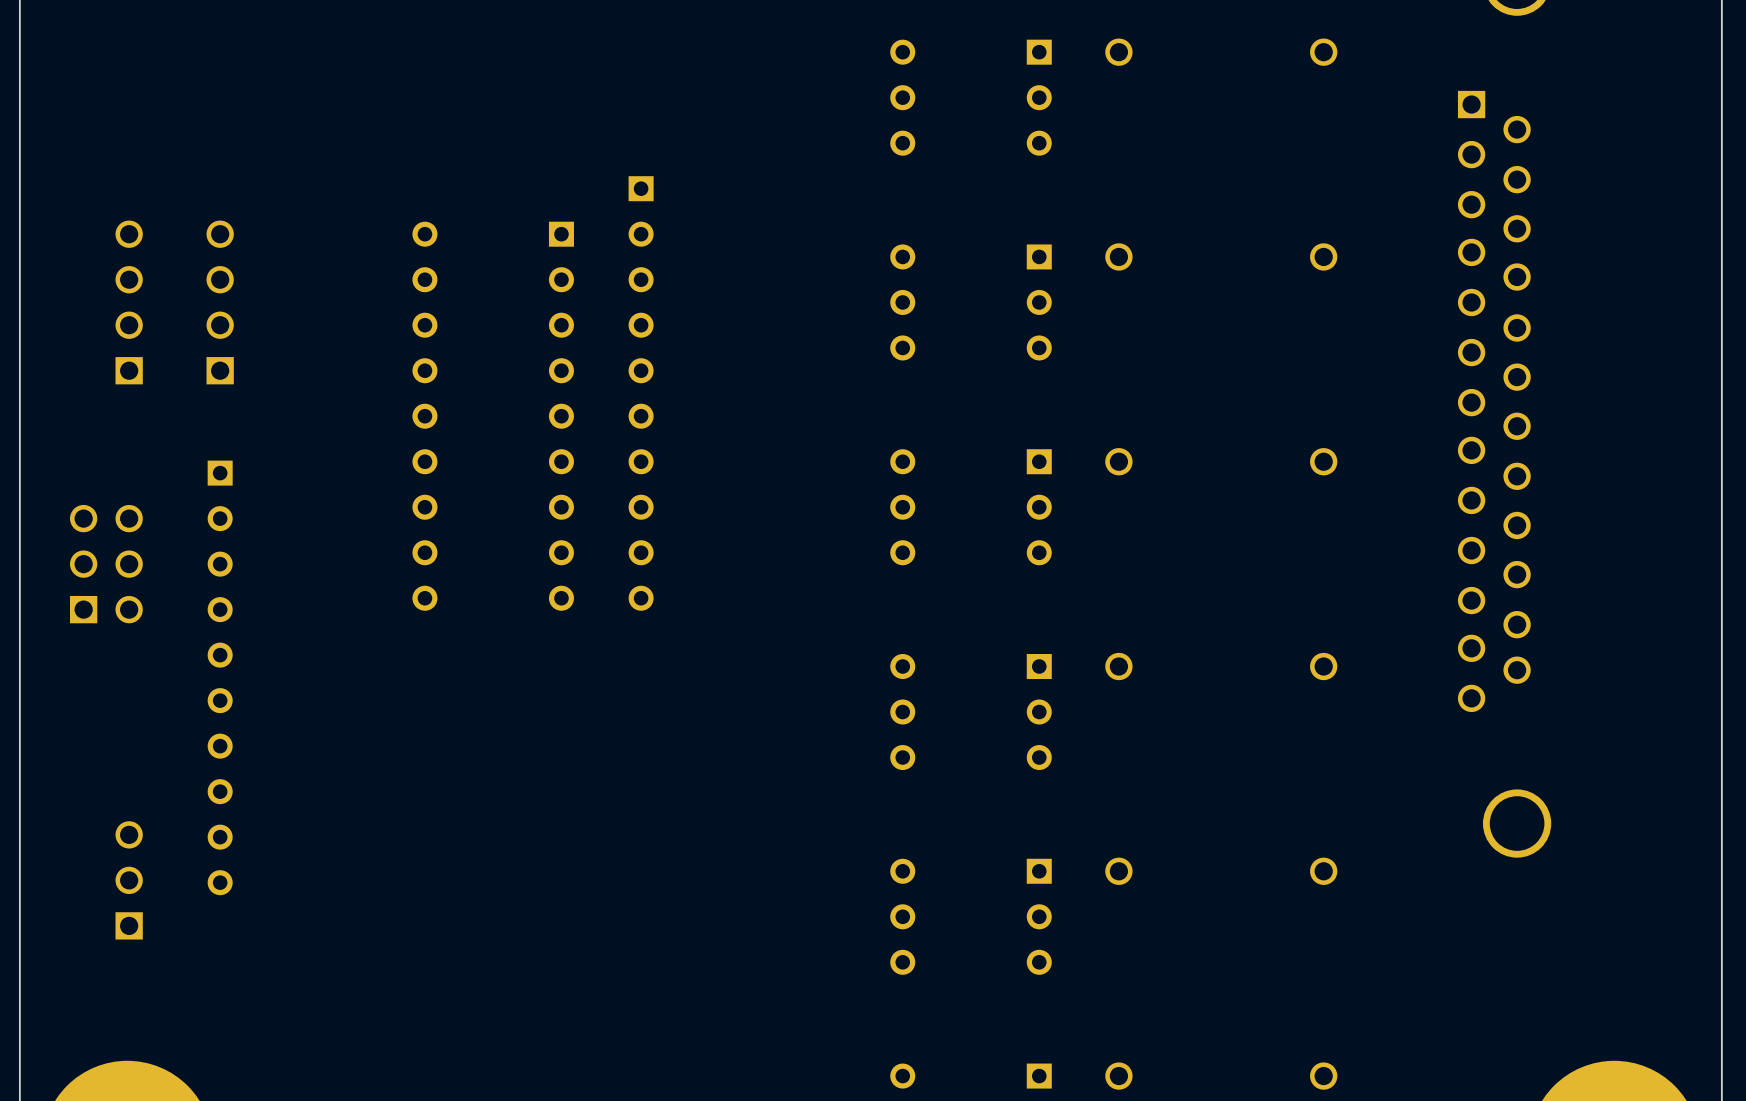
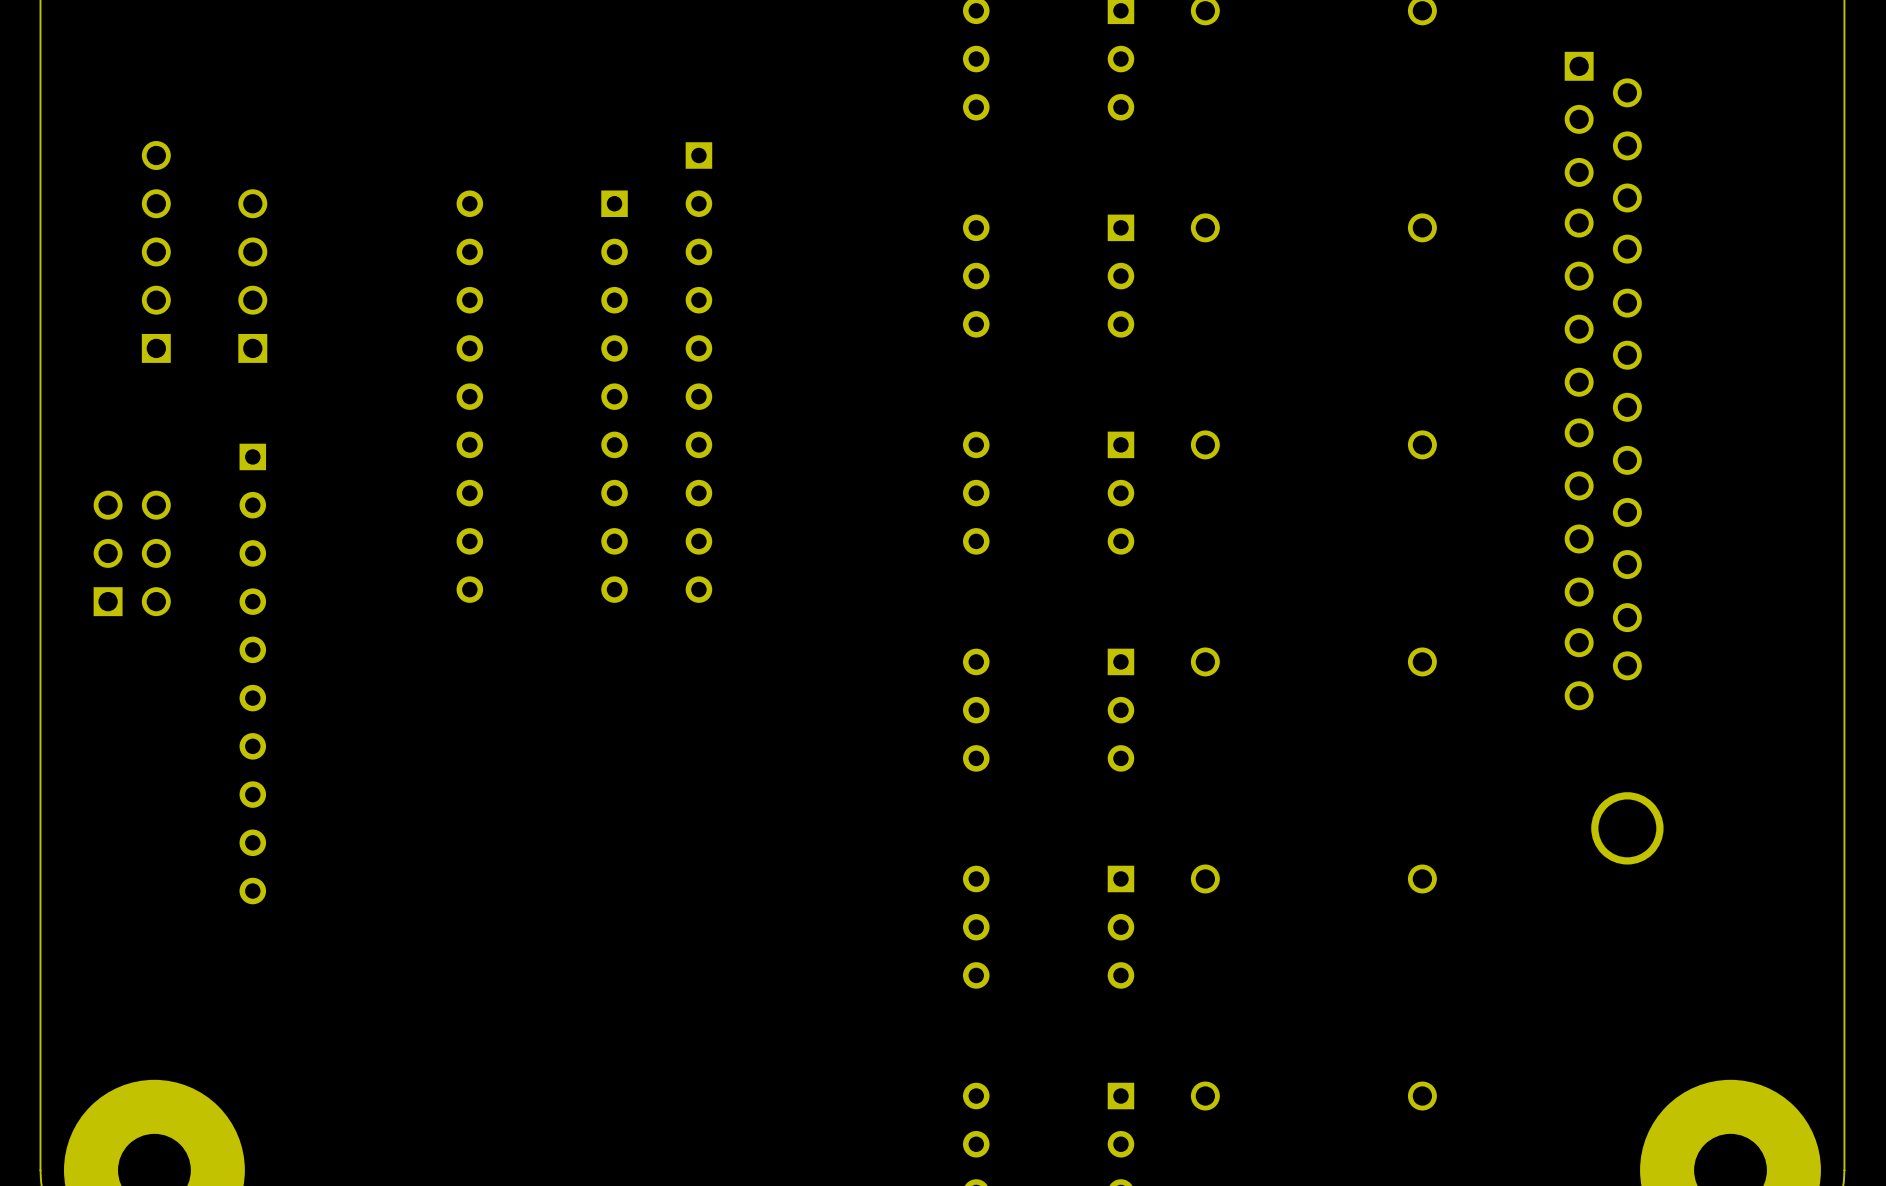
part: none -> (156, 251)
part: (129, 880) -> none

